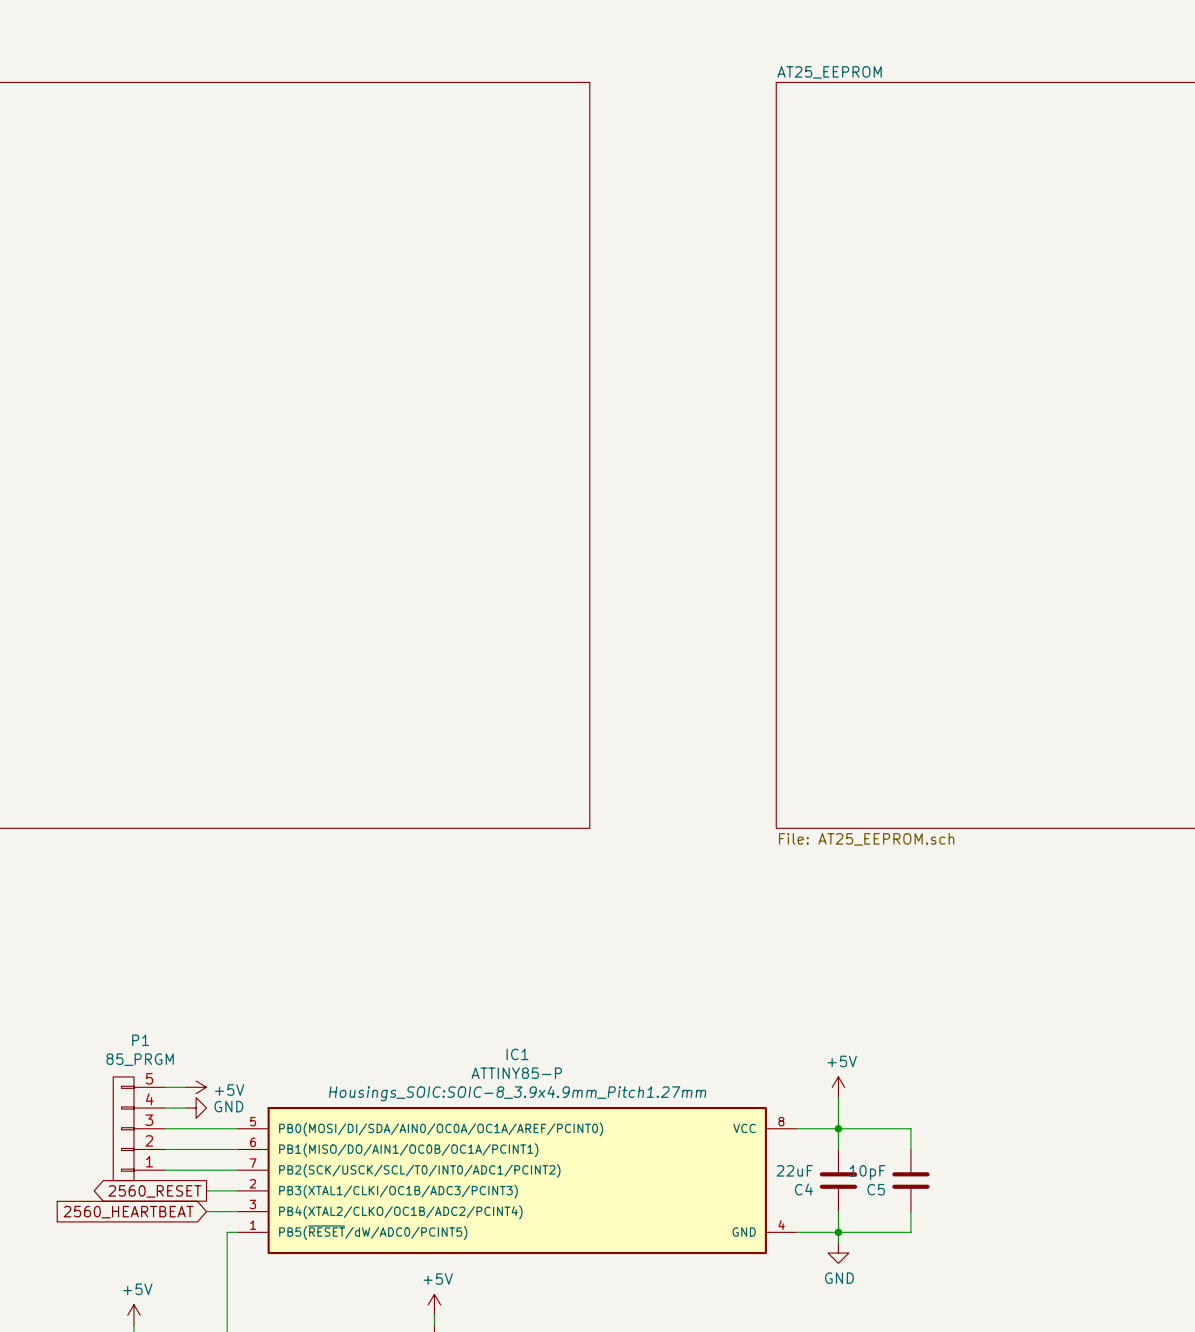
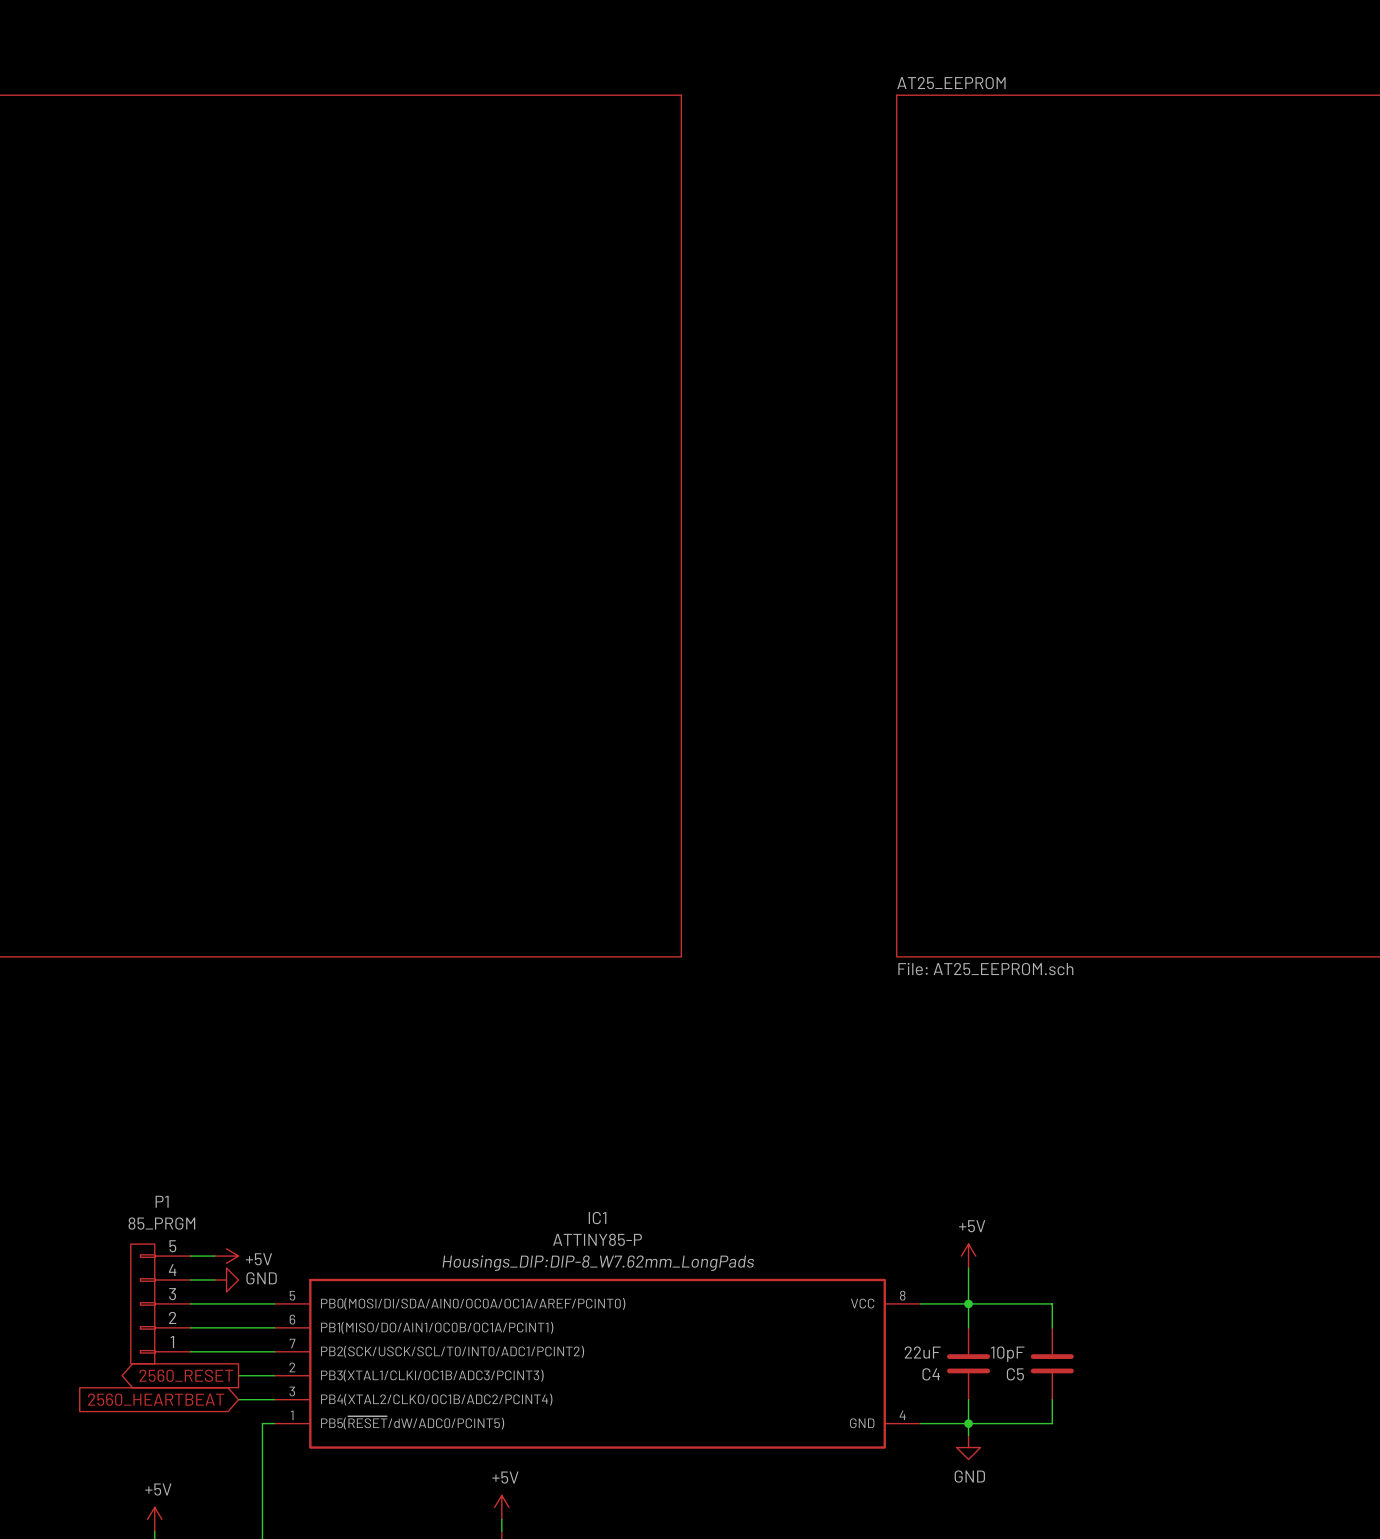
IC1 text: Housings_SOIC:SOIC-8_3.9x4.9mm_Pitch1.27mm (517, 1093) -> Housings_DIP:DIP-8_W7.62mm_LongPads (598, 1263)

